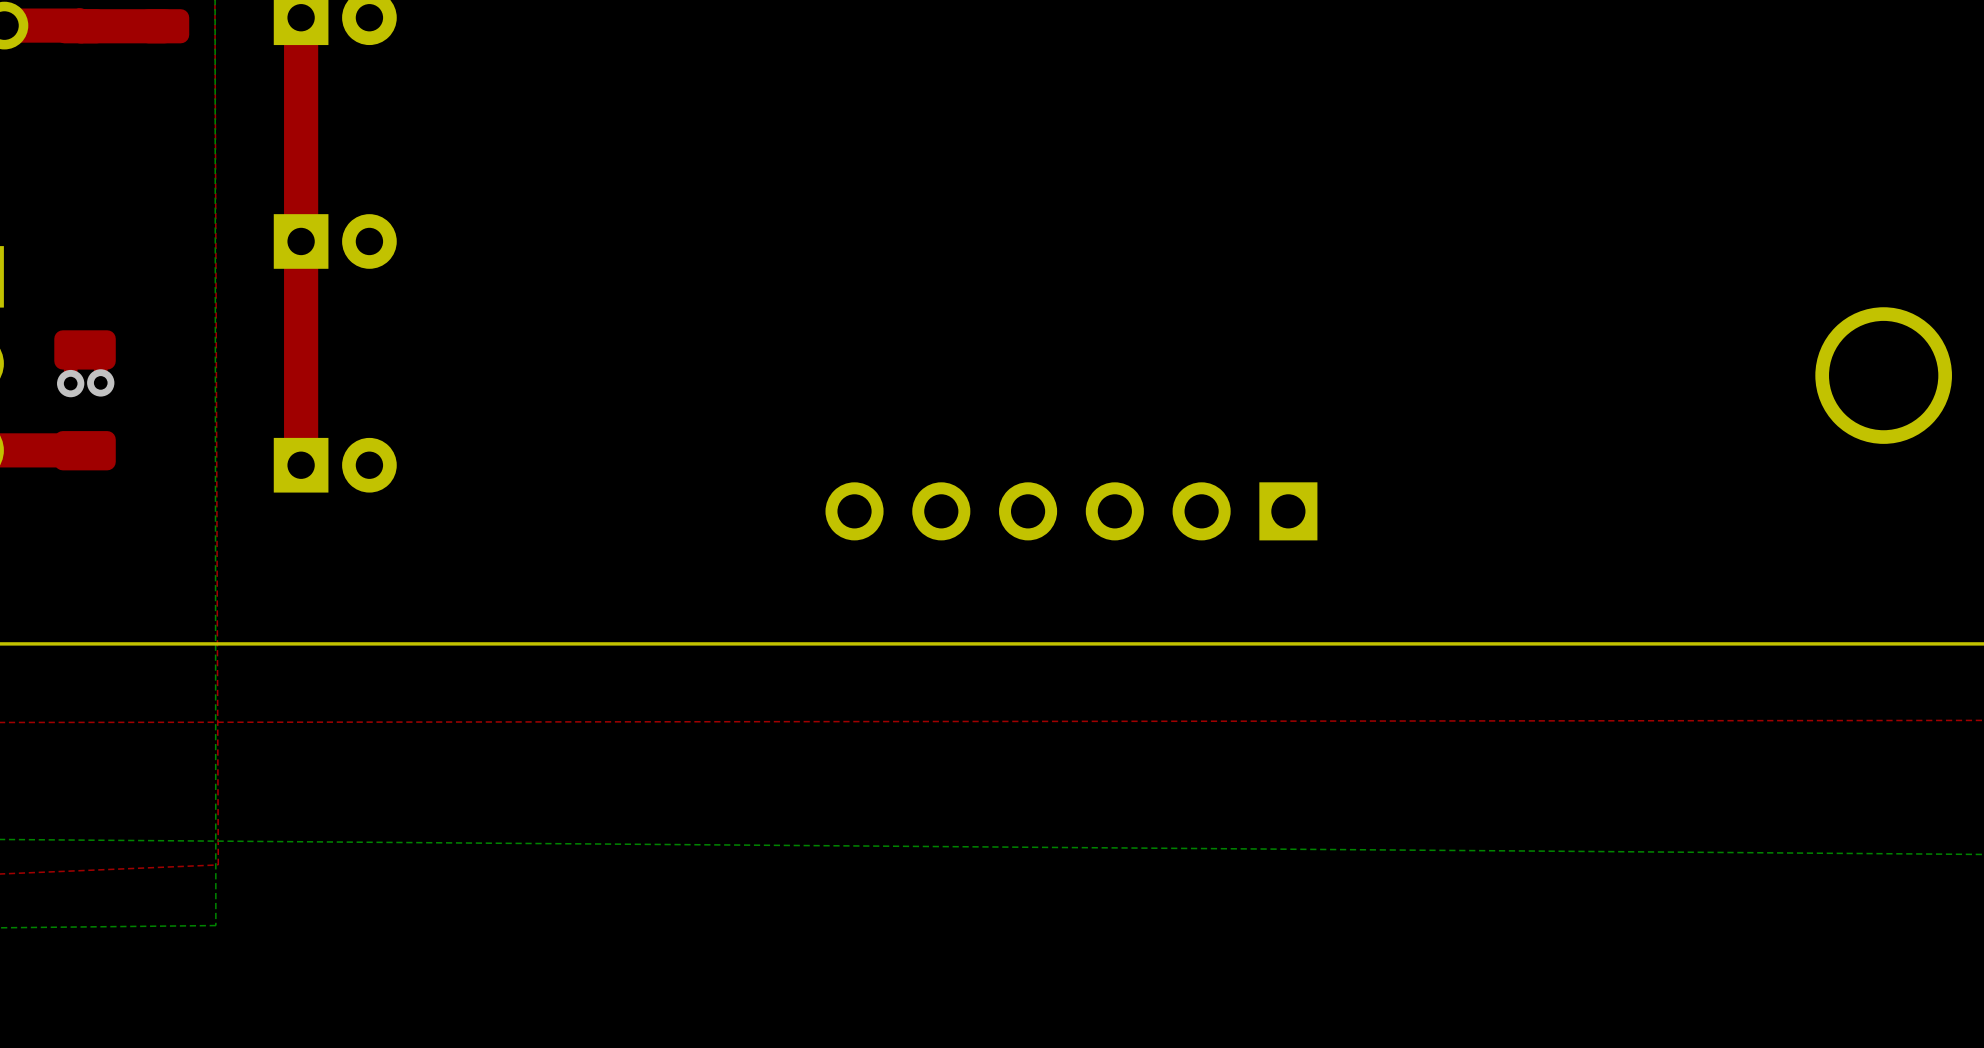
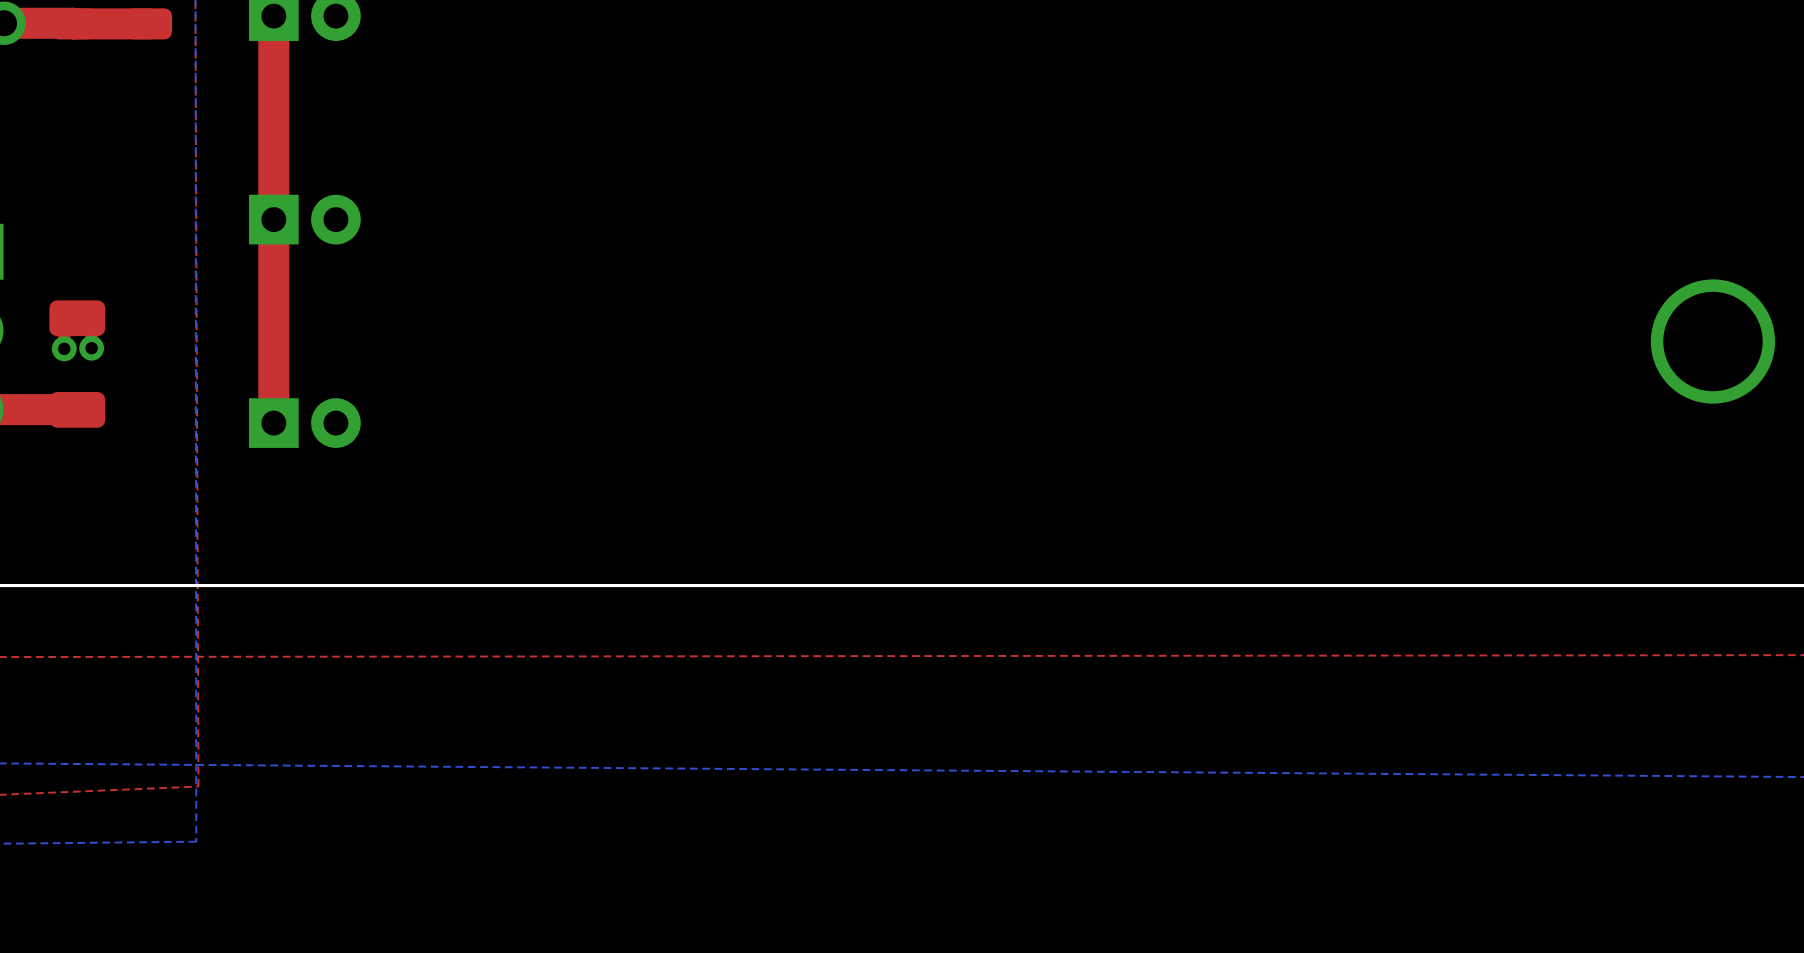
part: (1071, 511) -> none

